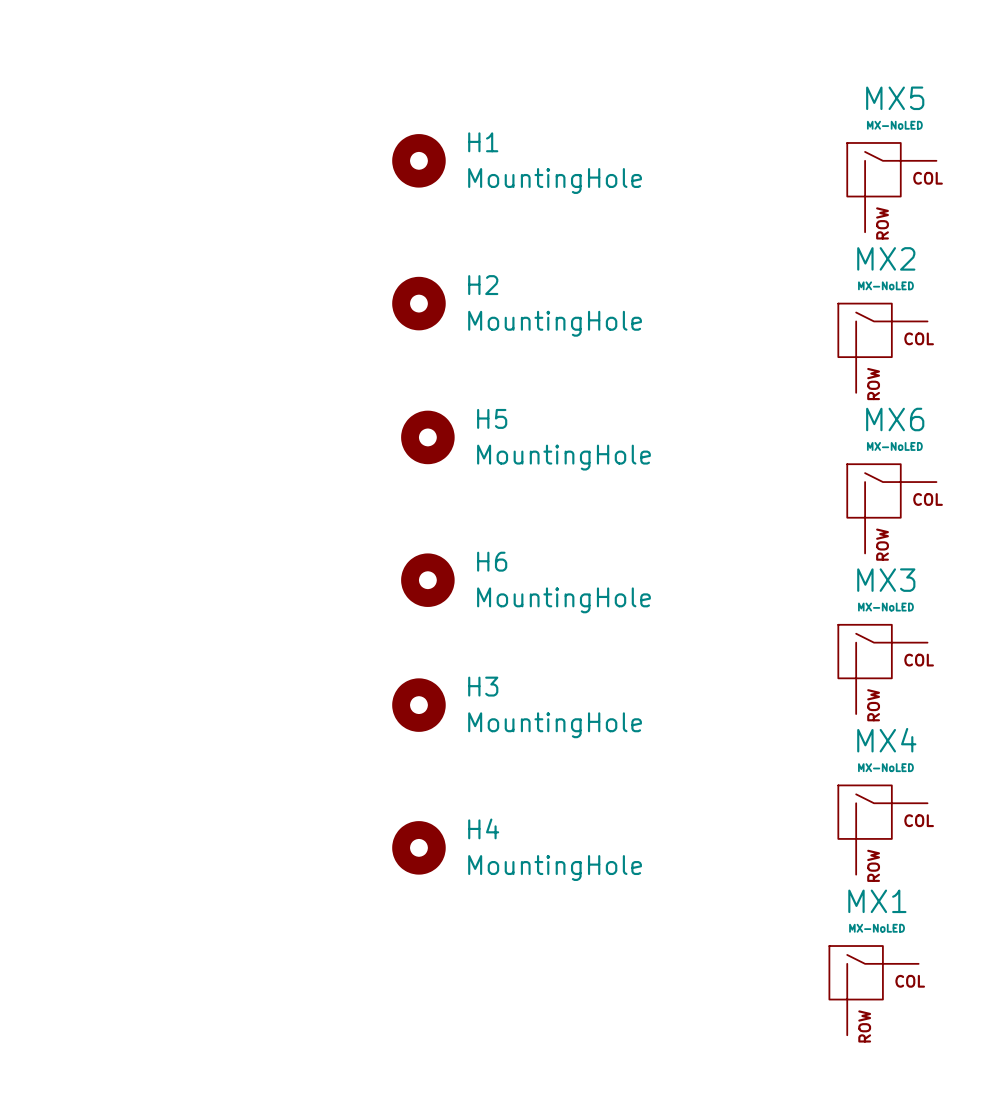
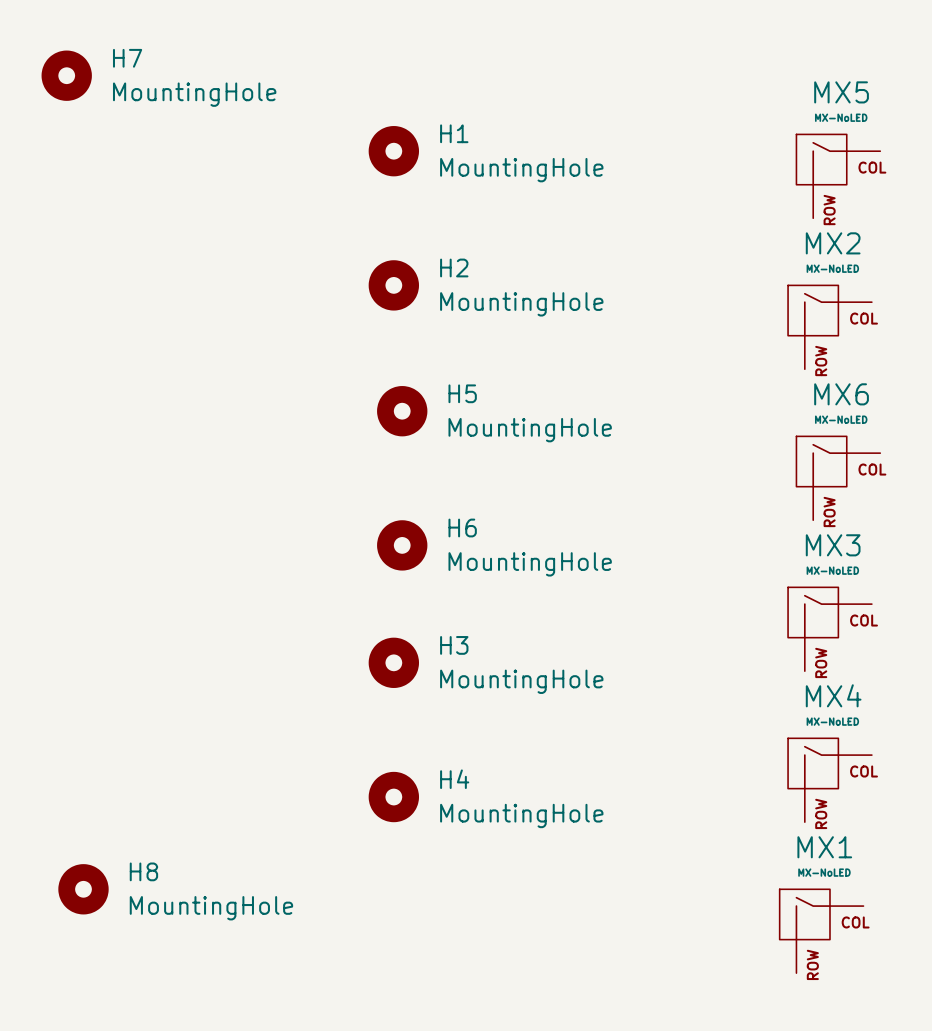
H7: none -> MountingHole (66, 75)
H8: none -> MountingHole (83, 889)

